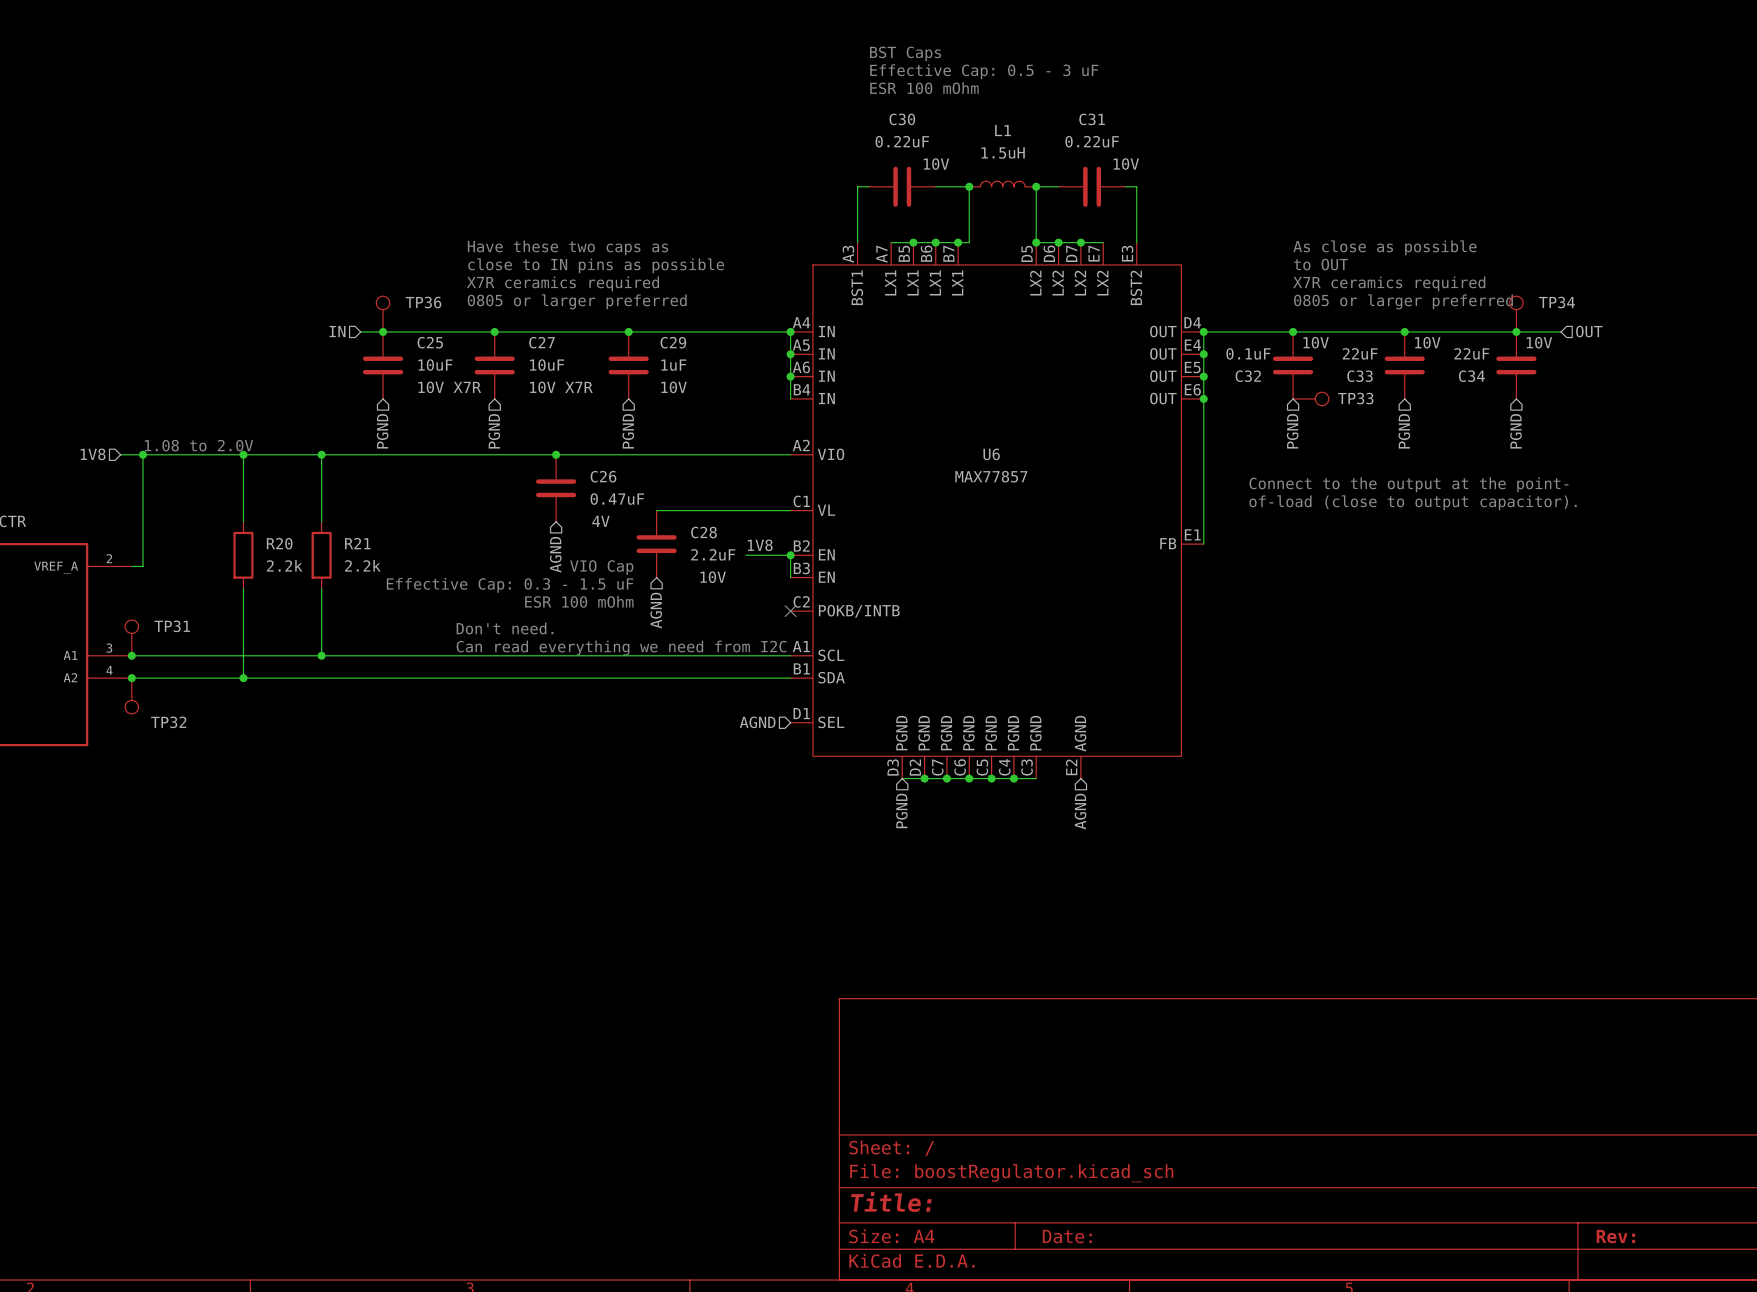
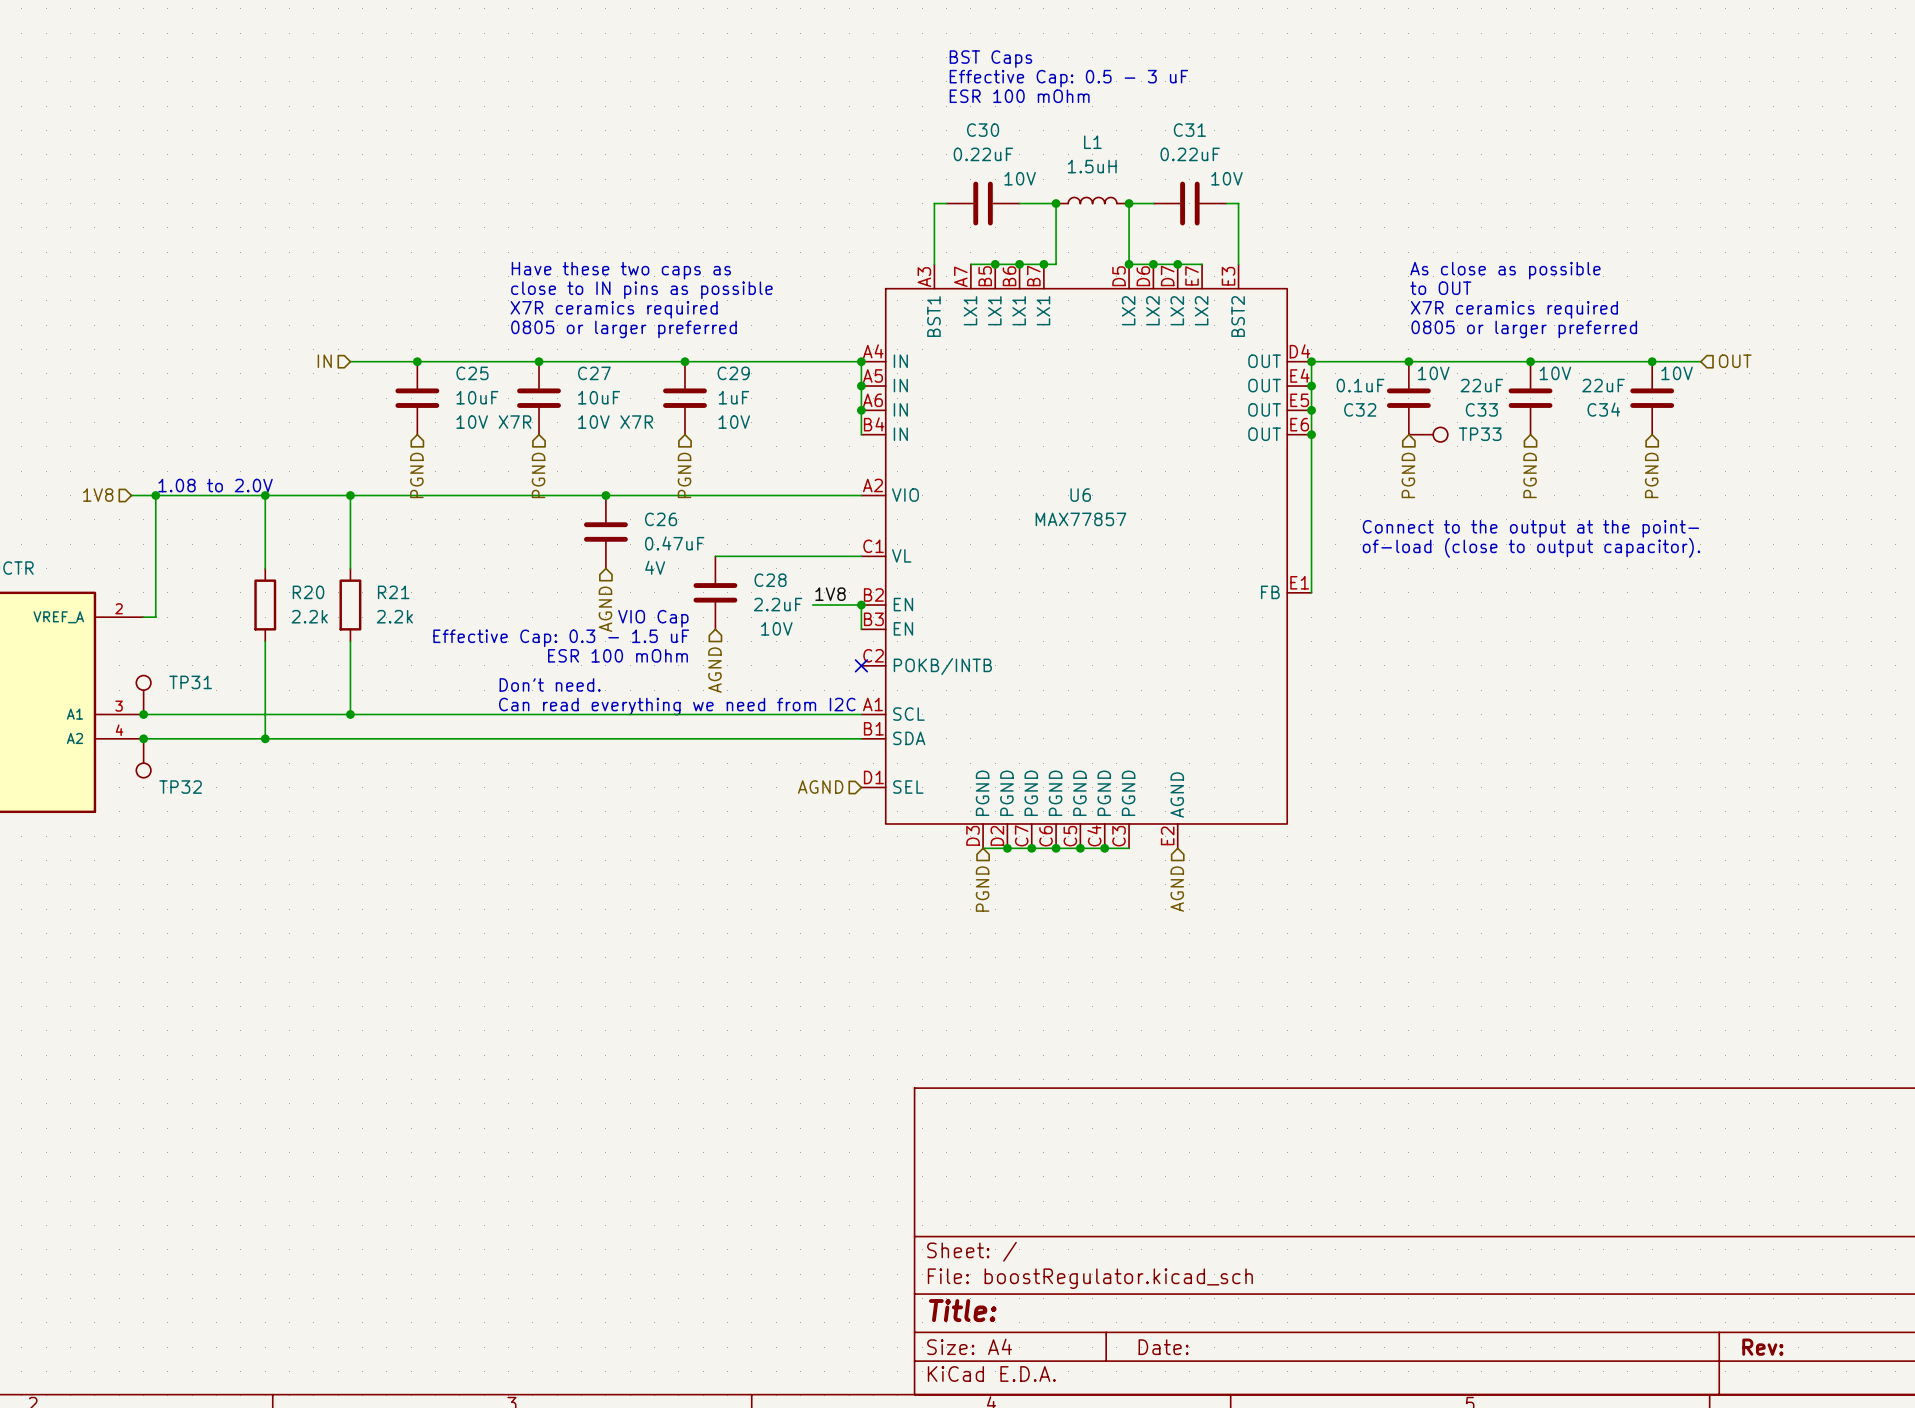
TP36: (383, 314) -> none
TP34: (1516, 314) -> none
wire: none -> (350, 361) (393, 361)
hierarchical label position: IN (337, 331) -> IN (324, 361)

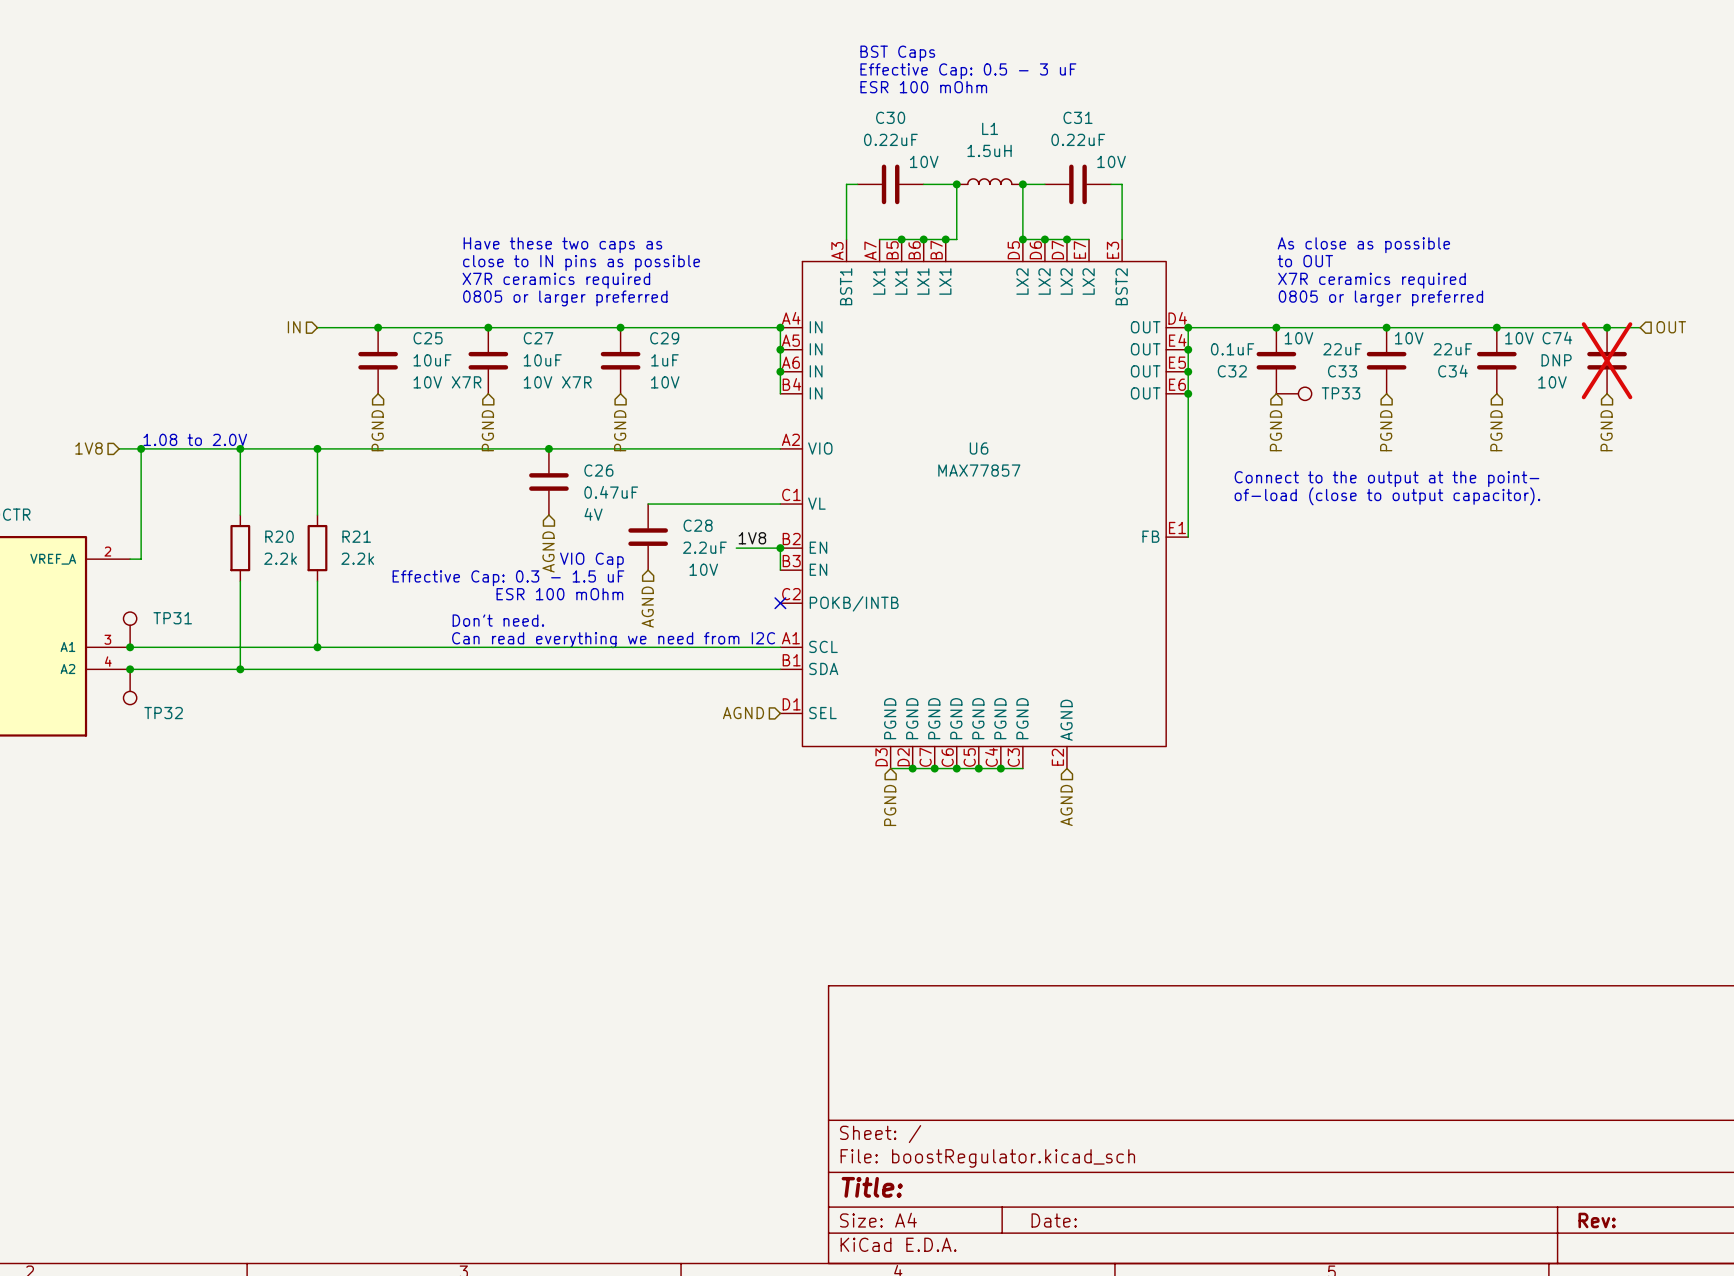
wire: none -> (1540, 327) (1640, 327)
hierarchical label position: OUT (1735, 361) -> OUT (1671, 327)
junction: none -> (1607, 327)
C74: none -> DNP (1607, 360)
hierarchical label: none -> PGND (1606, 430)

